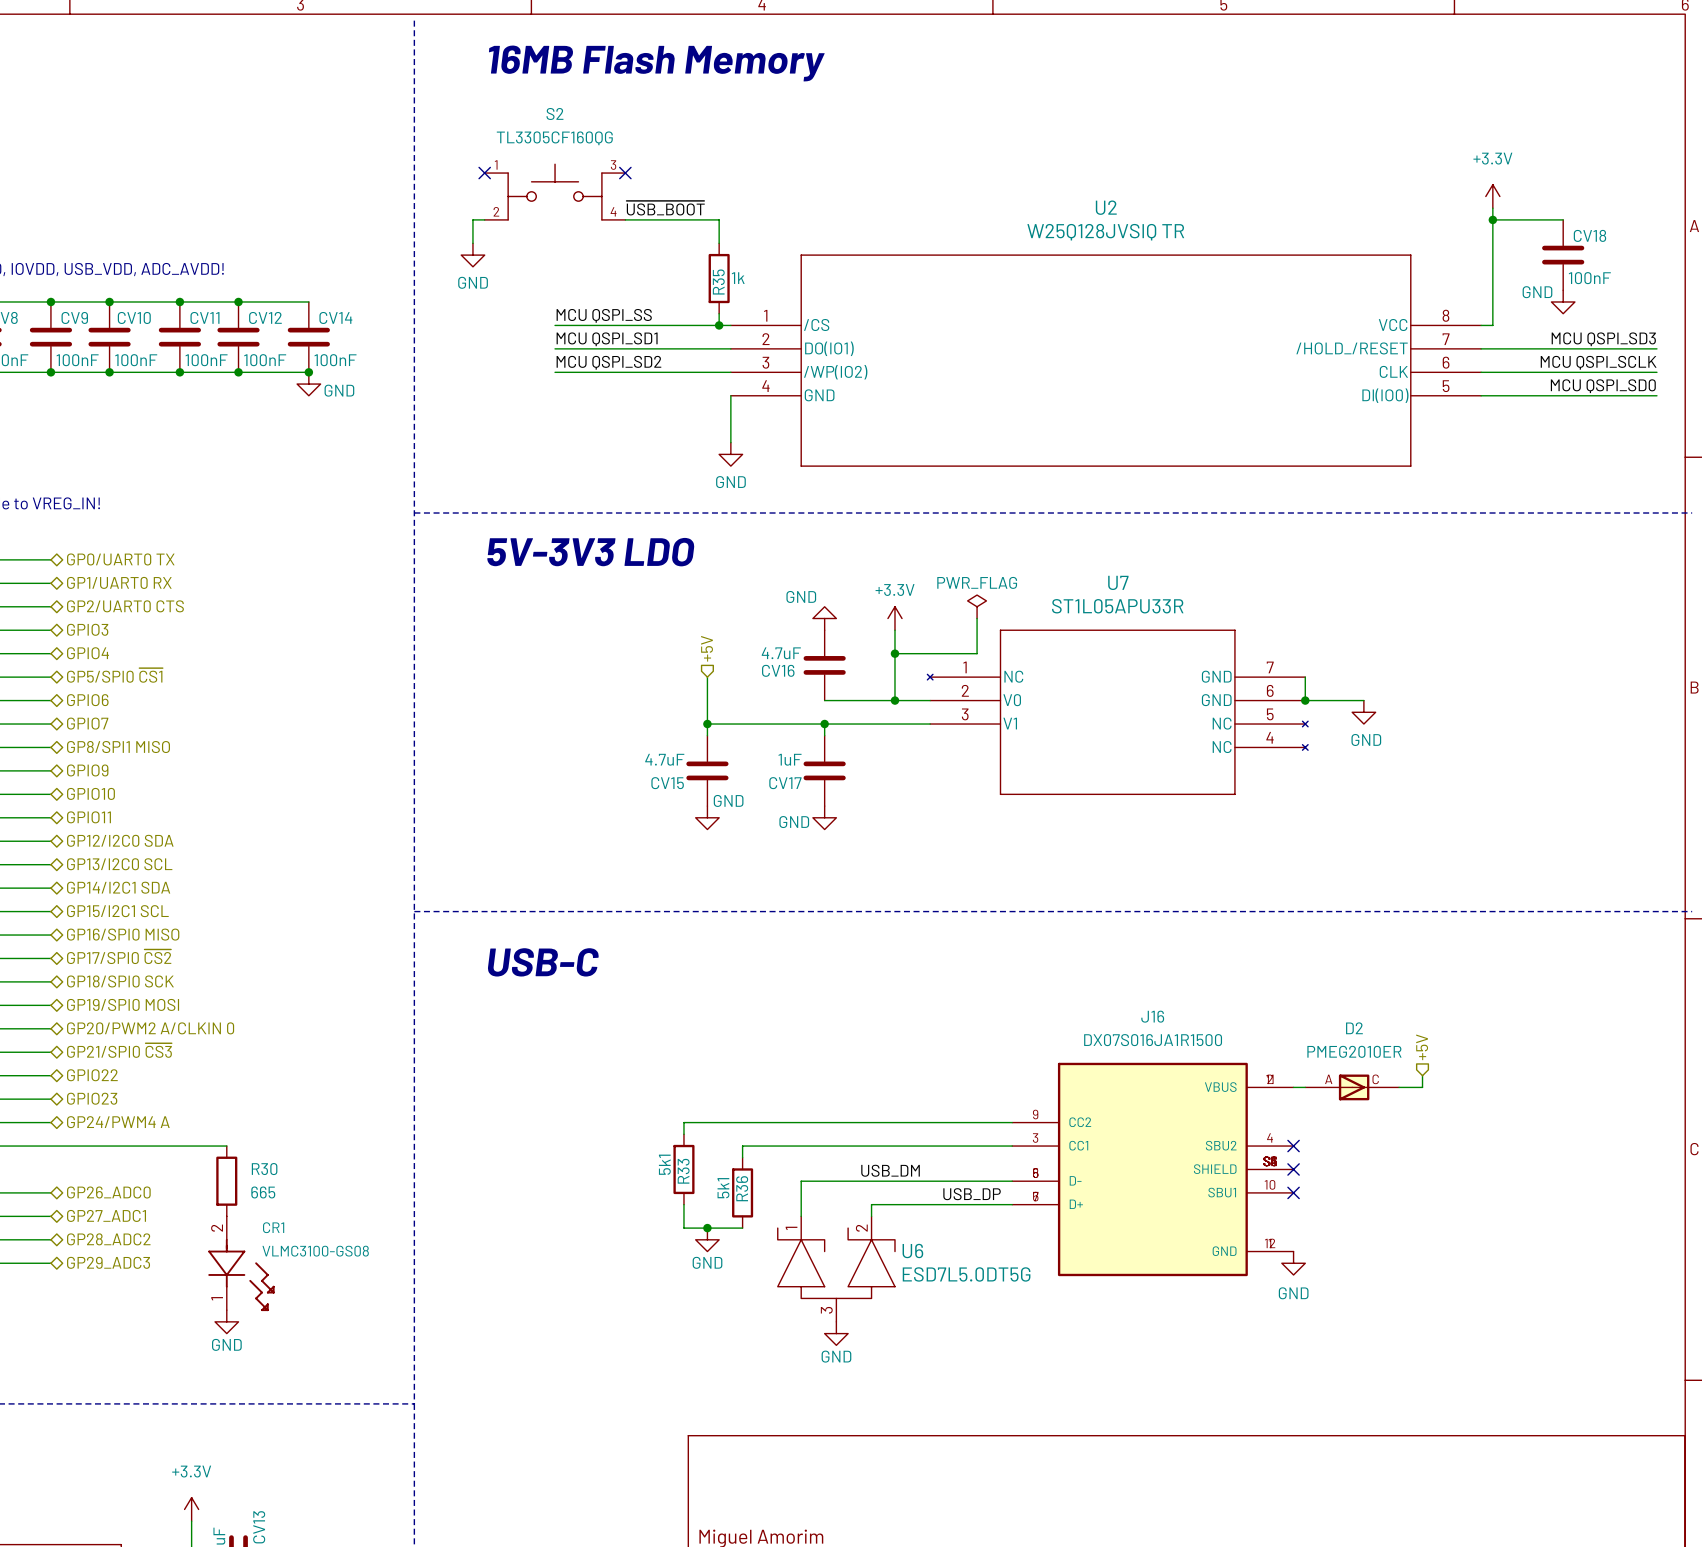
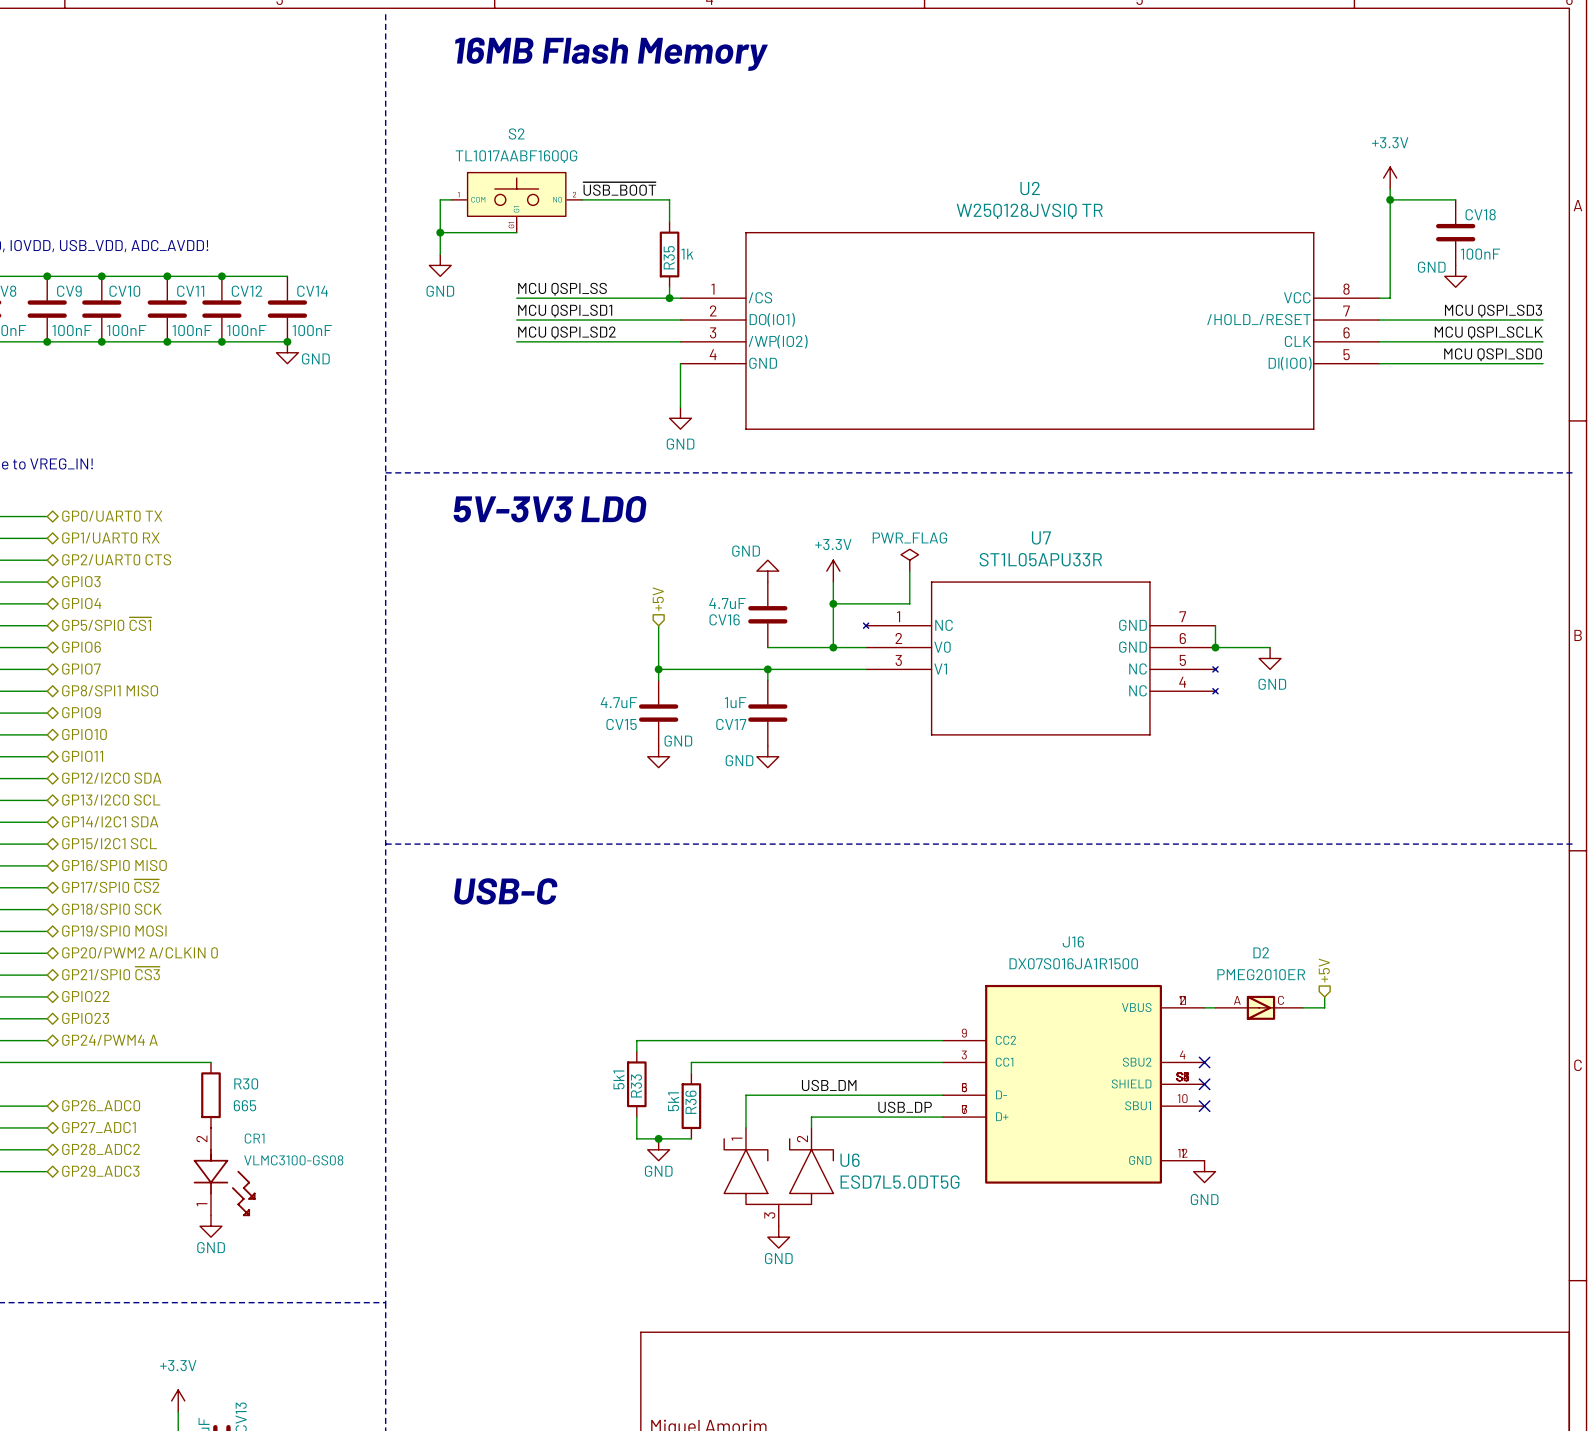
S2 value: TL3305CF160QG (554, 138) -> TL1017AABF160QG (516, 156)
S2 symbol: [484, 163, 626, 221] -> [451, 172, 583, 233]
no-connect mark: (484, 173) -> none
no-connect mark: (625, 173) -> none
wire: none -> (440, 221) (440, 254)
wire: none -> (440, 232) (516, 232)
power symbol position: GND (472, 255) -> GND (440, 265)
junction: none -> (440, 232)

